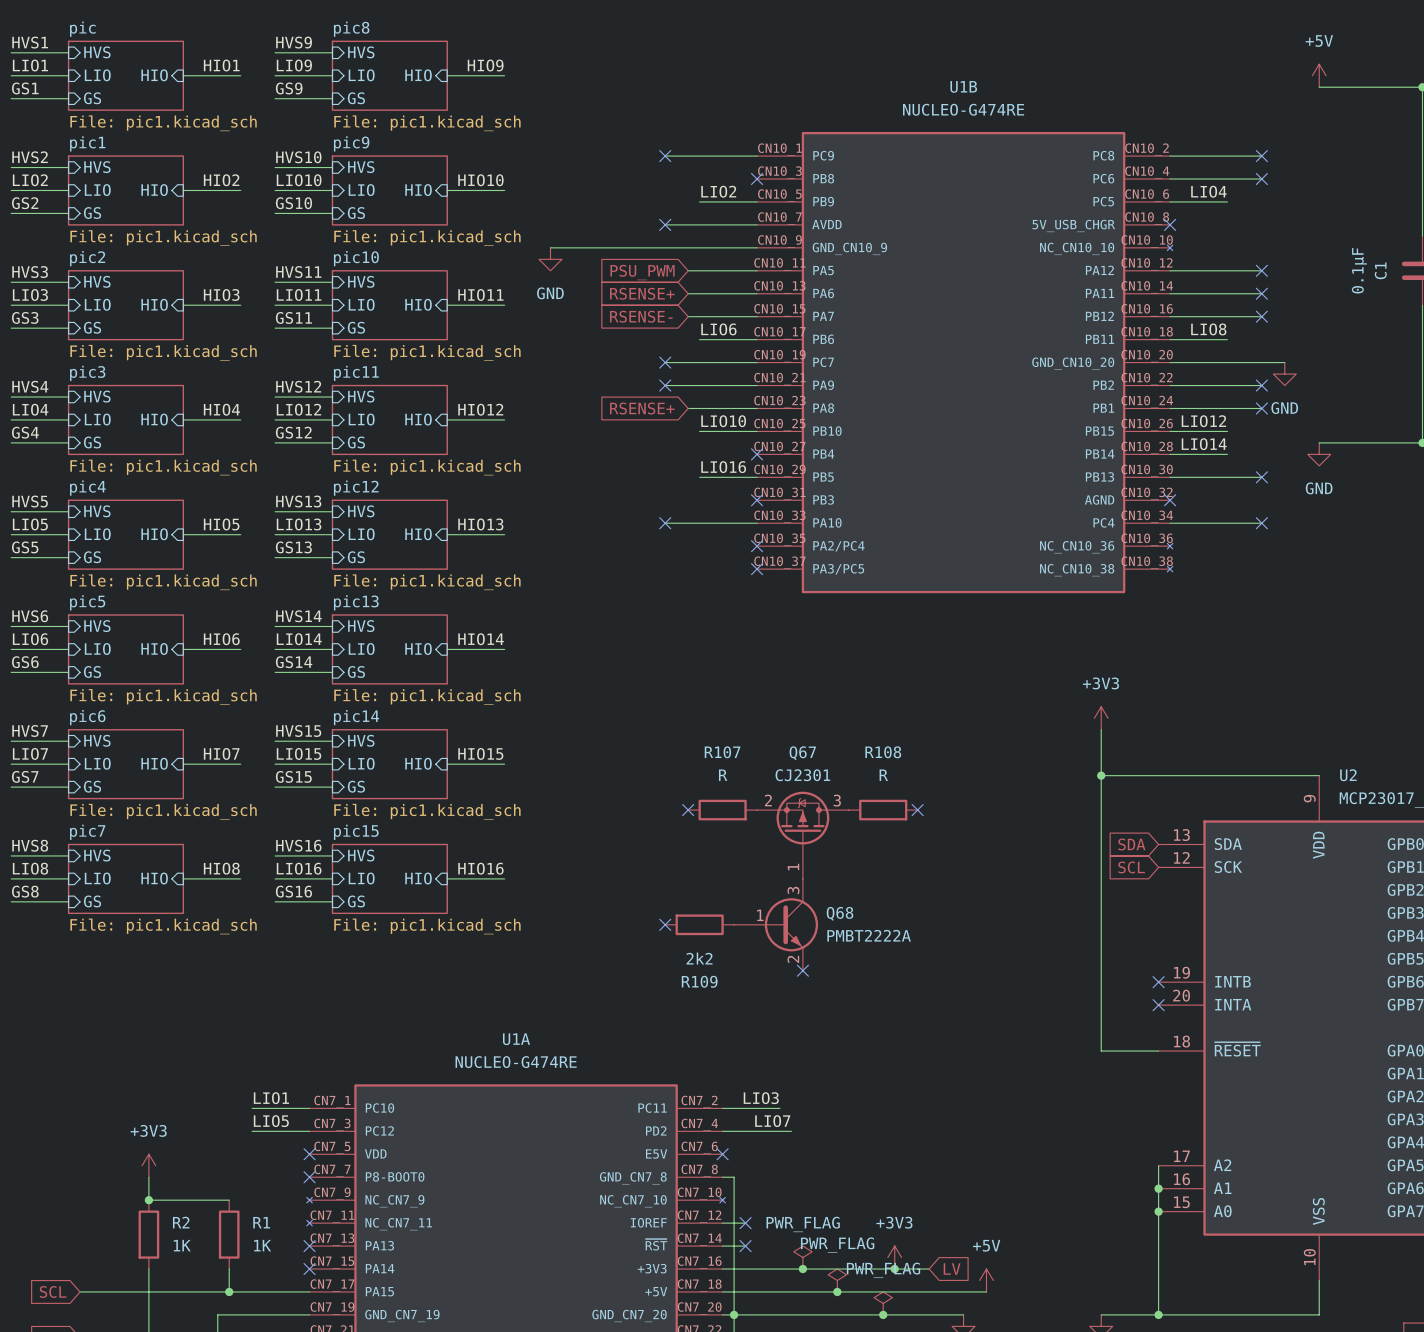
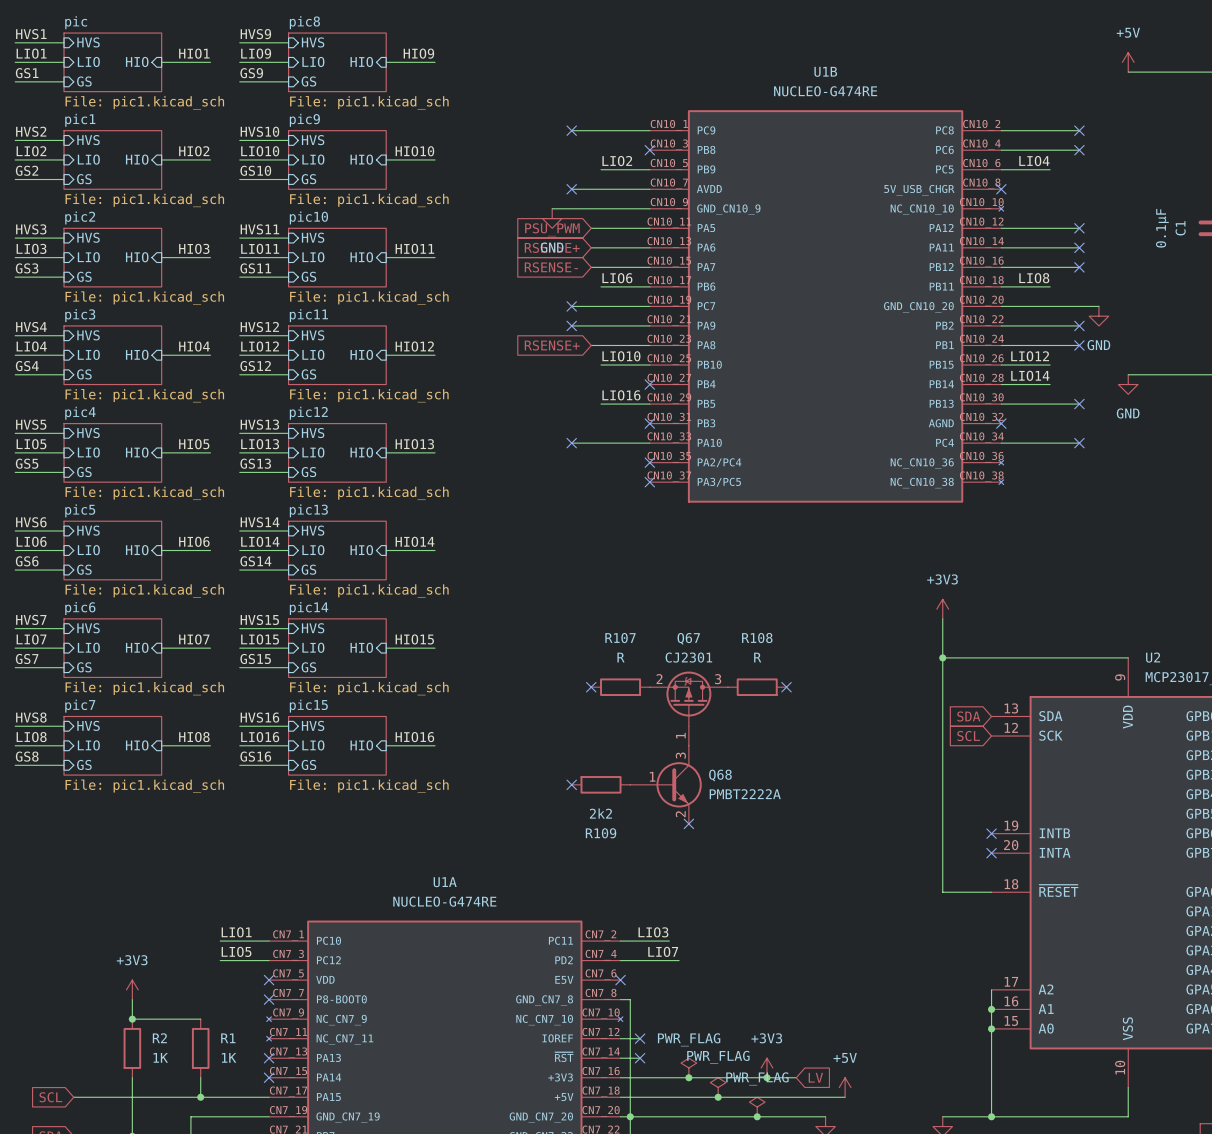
wire: (550, 247) (642, 247) -> none
power symbol position: GND (550, 259) -> GND (552, 218)

